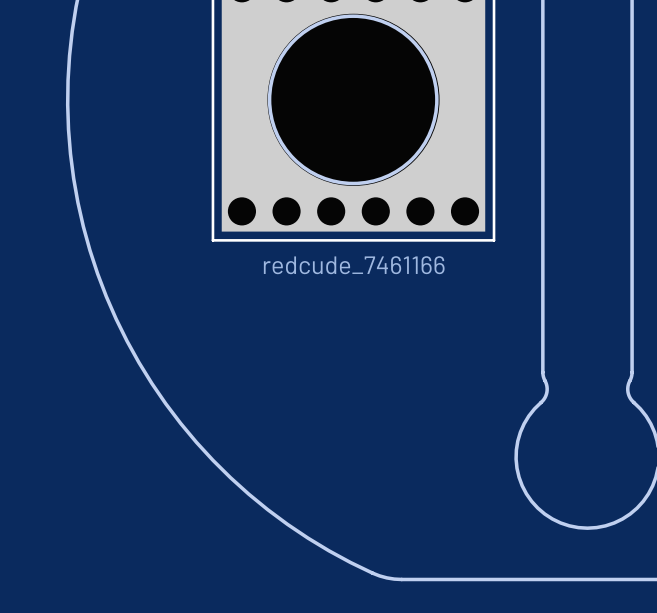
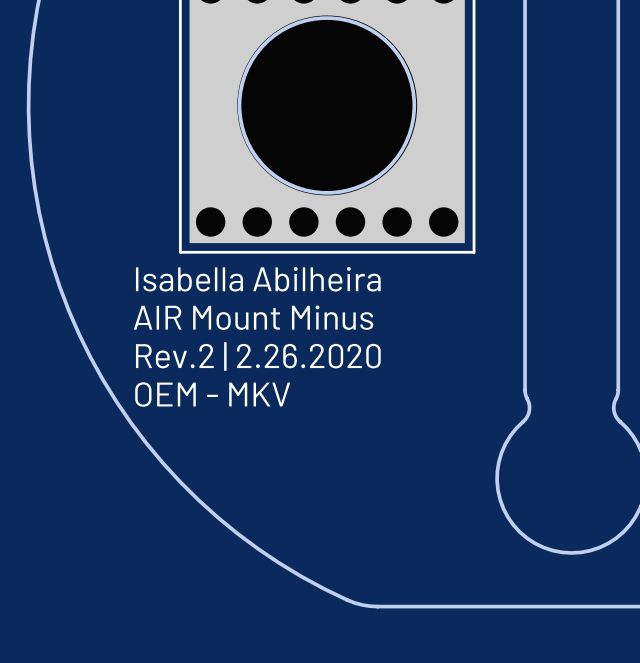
part value: redcude_7461166 (354, 265) -> none
text: none -> Isabella Abilheira (258, 279)
text: none -> AIR Mount Minus (253, 317)
text: none -> Rev.2 | 2.26.2020 (258, 356)
text: none -> OEM - MKV (212, 394)

